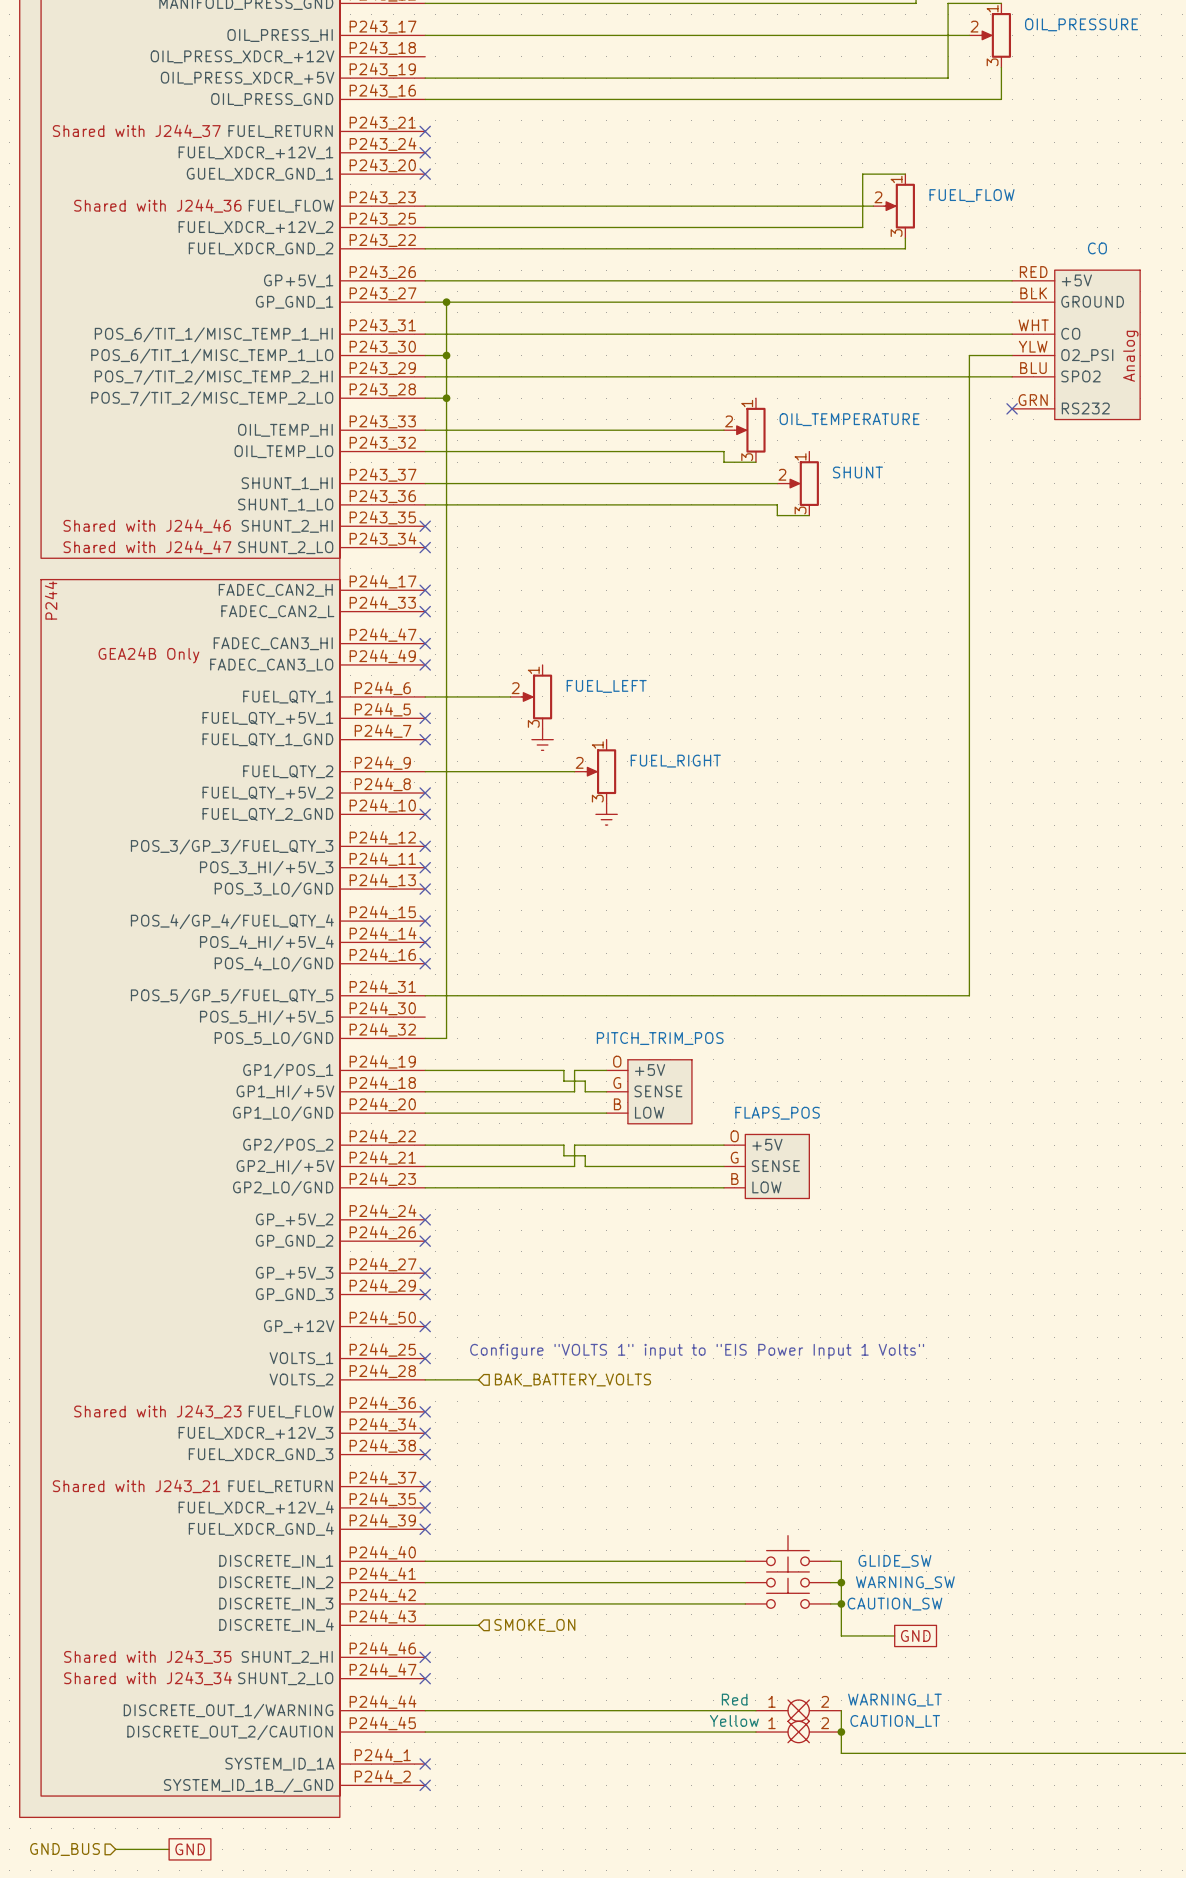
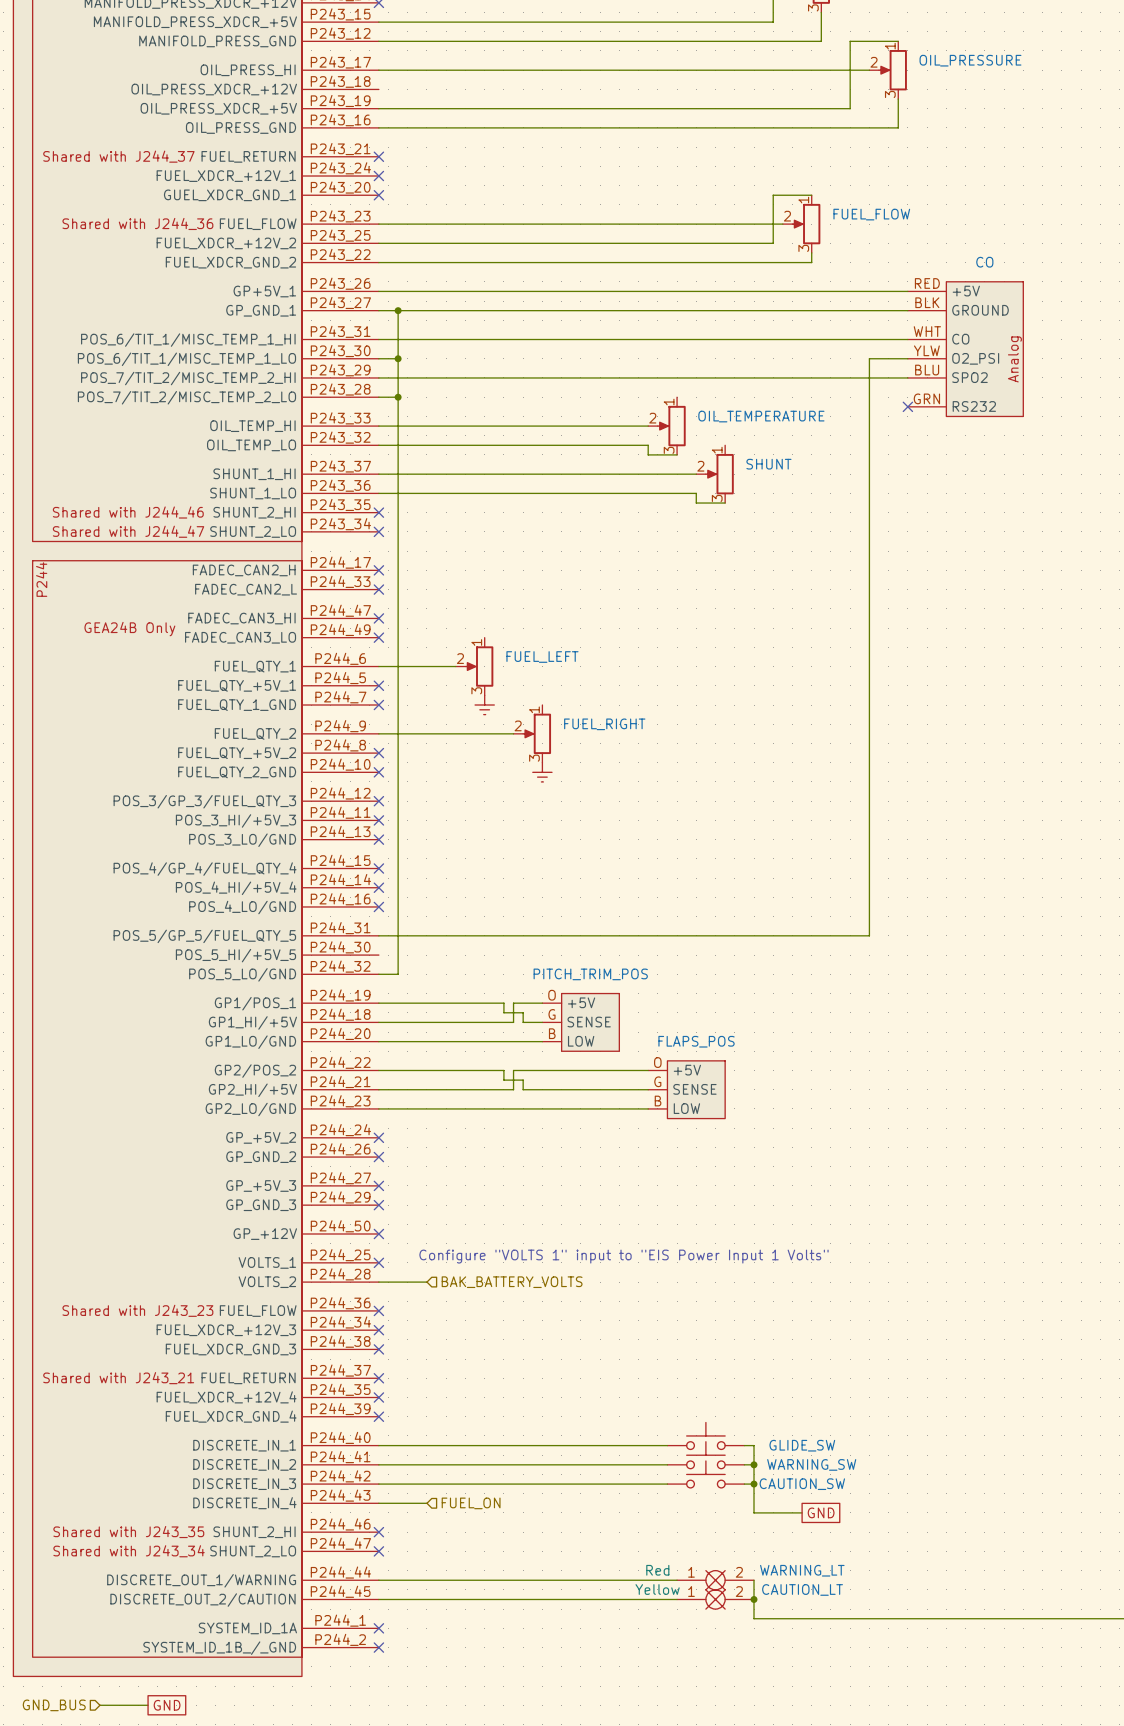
hierarchical label: SMOKE_ON (534, 1625) -> FUEL_ON (471, 1503)

